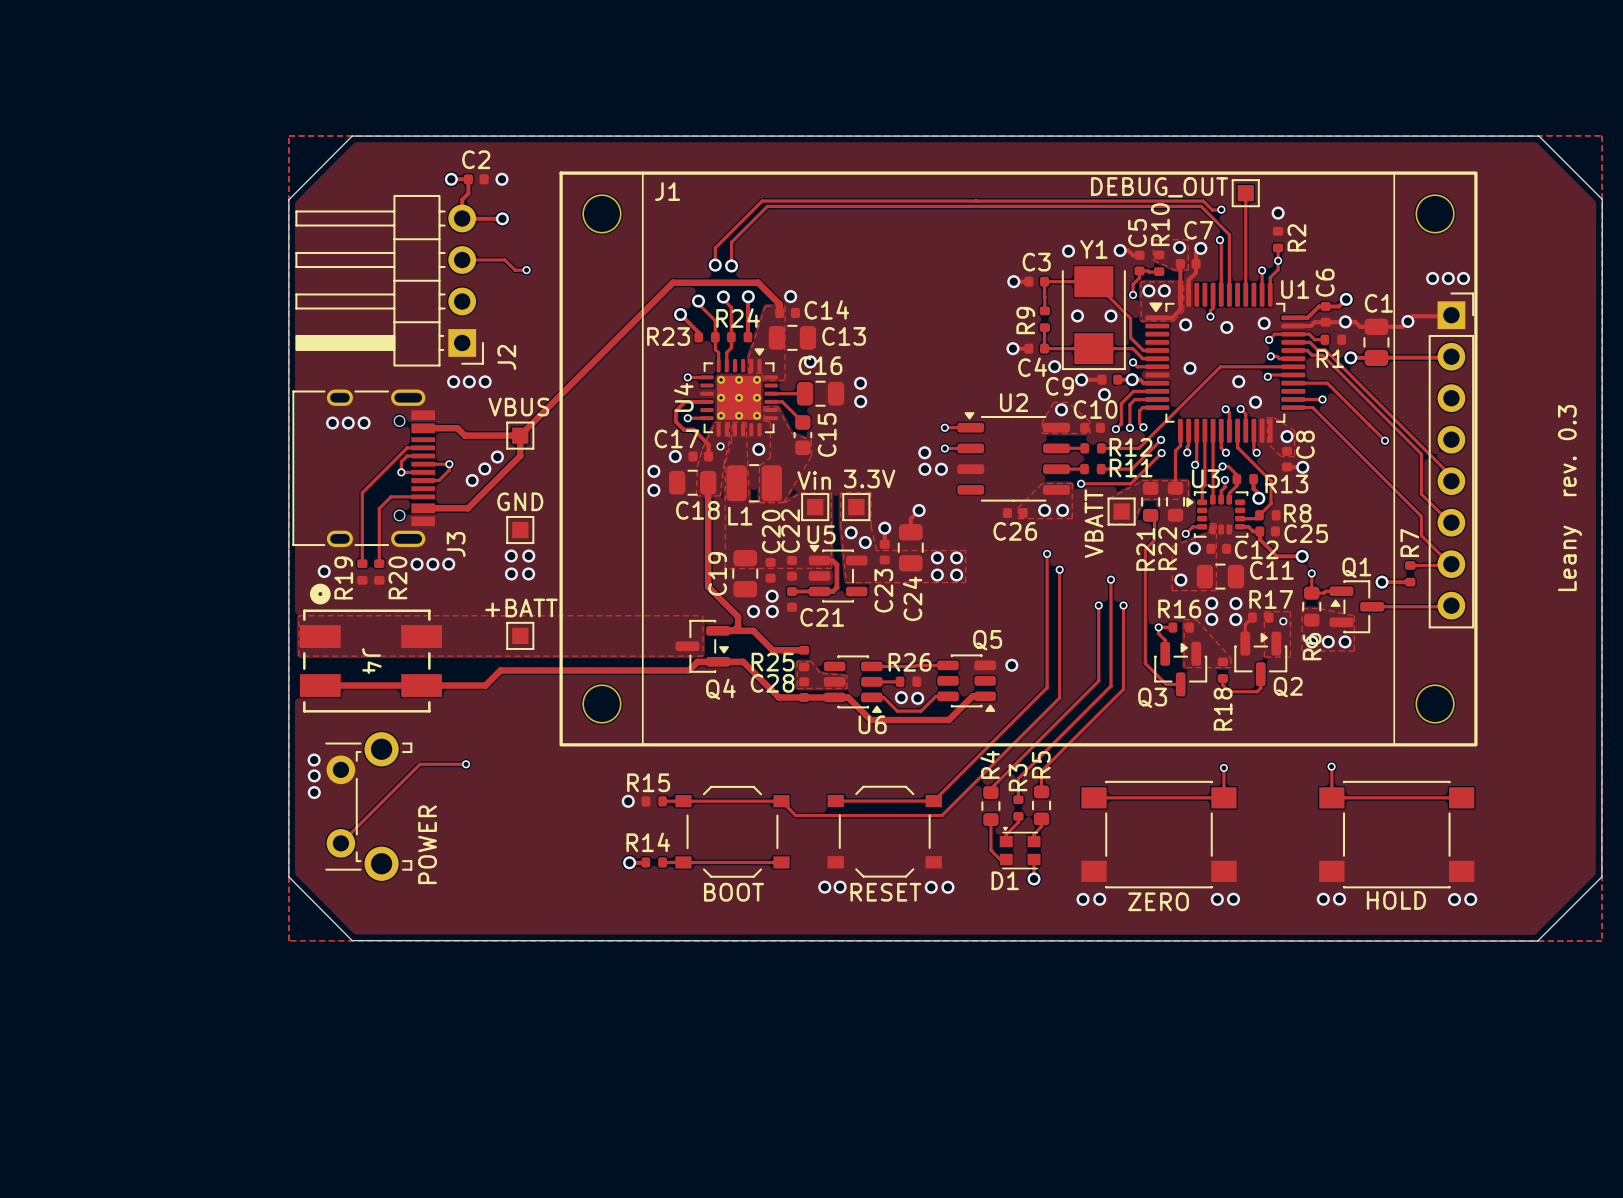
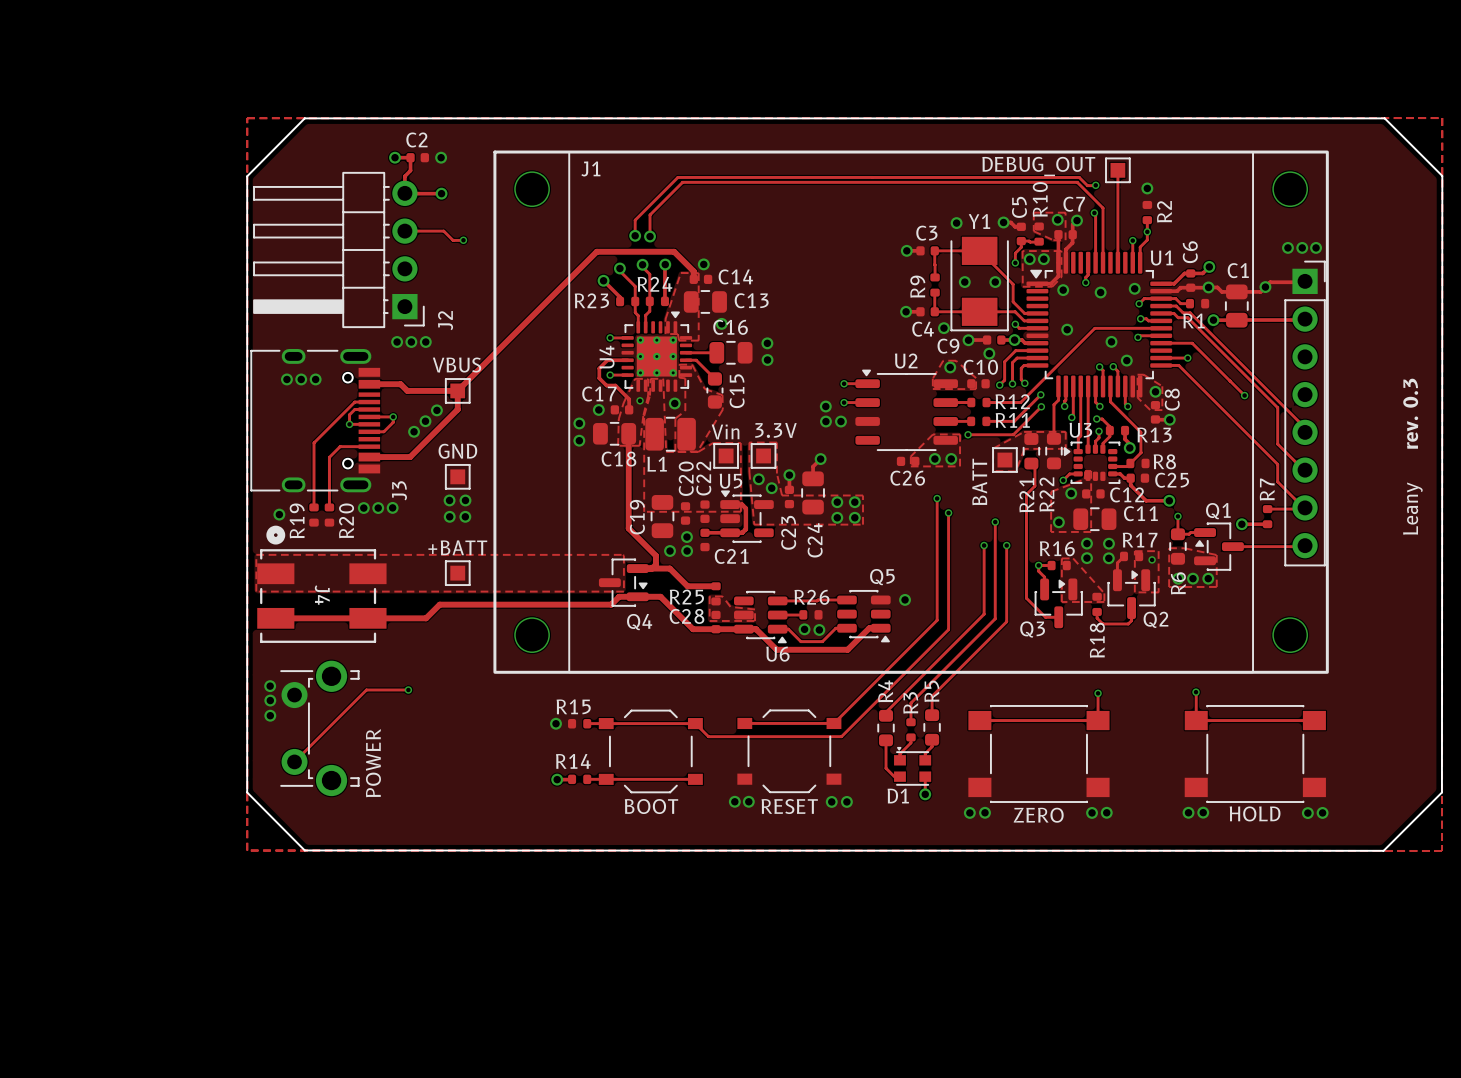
part value: VBATT (1094, 523) -> BATT (979, 481)

